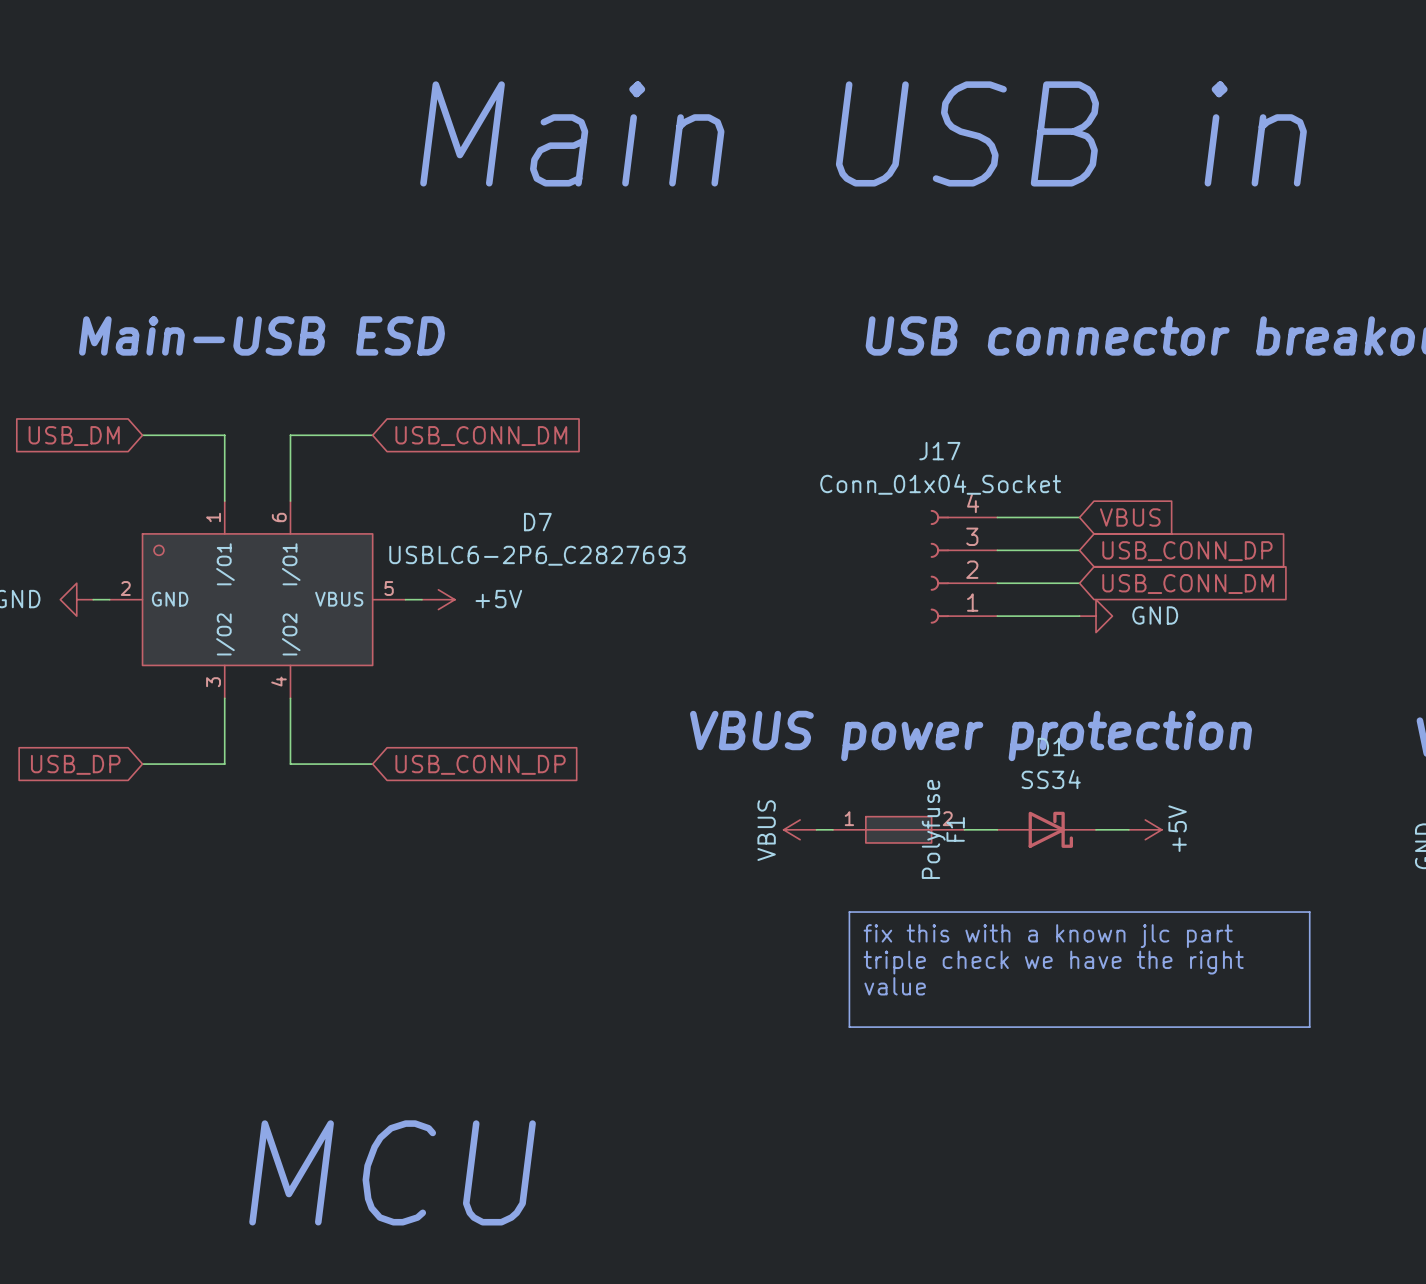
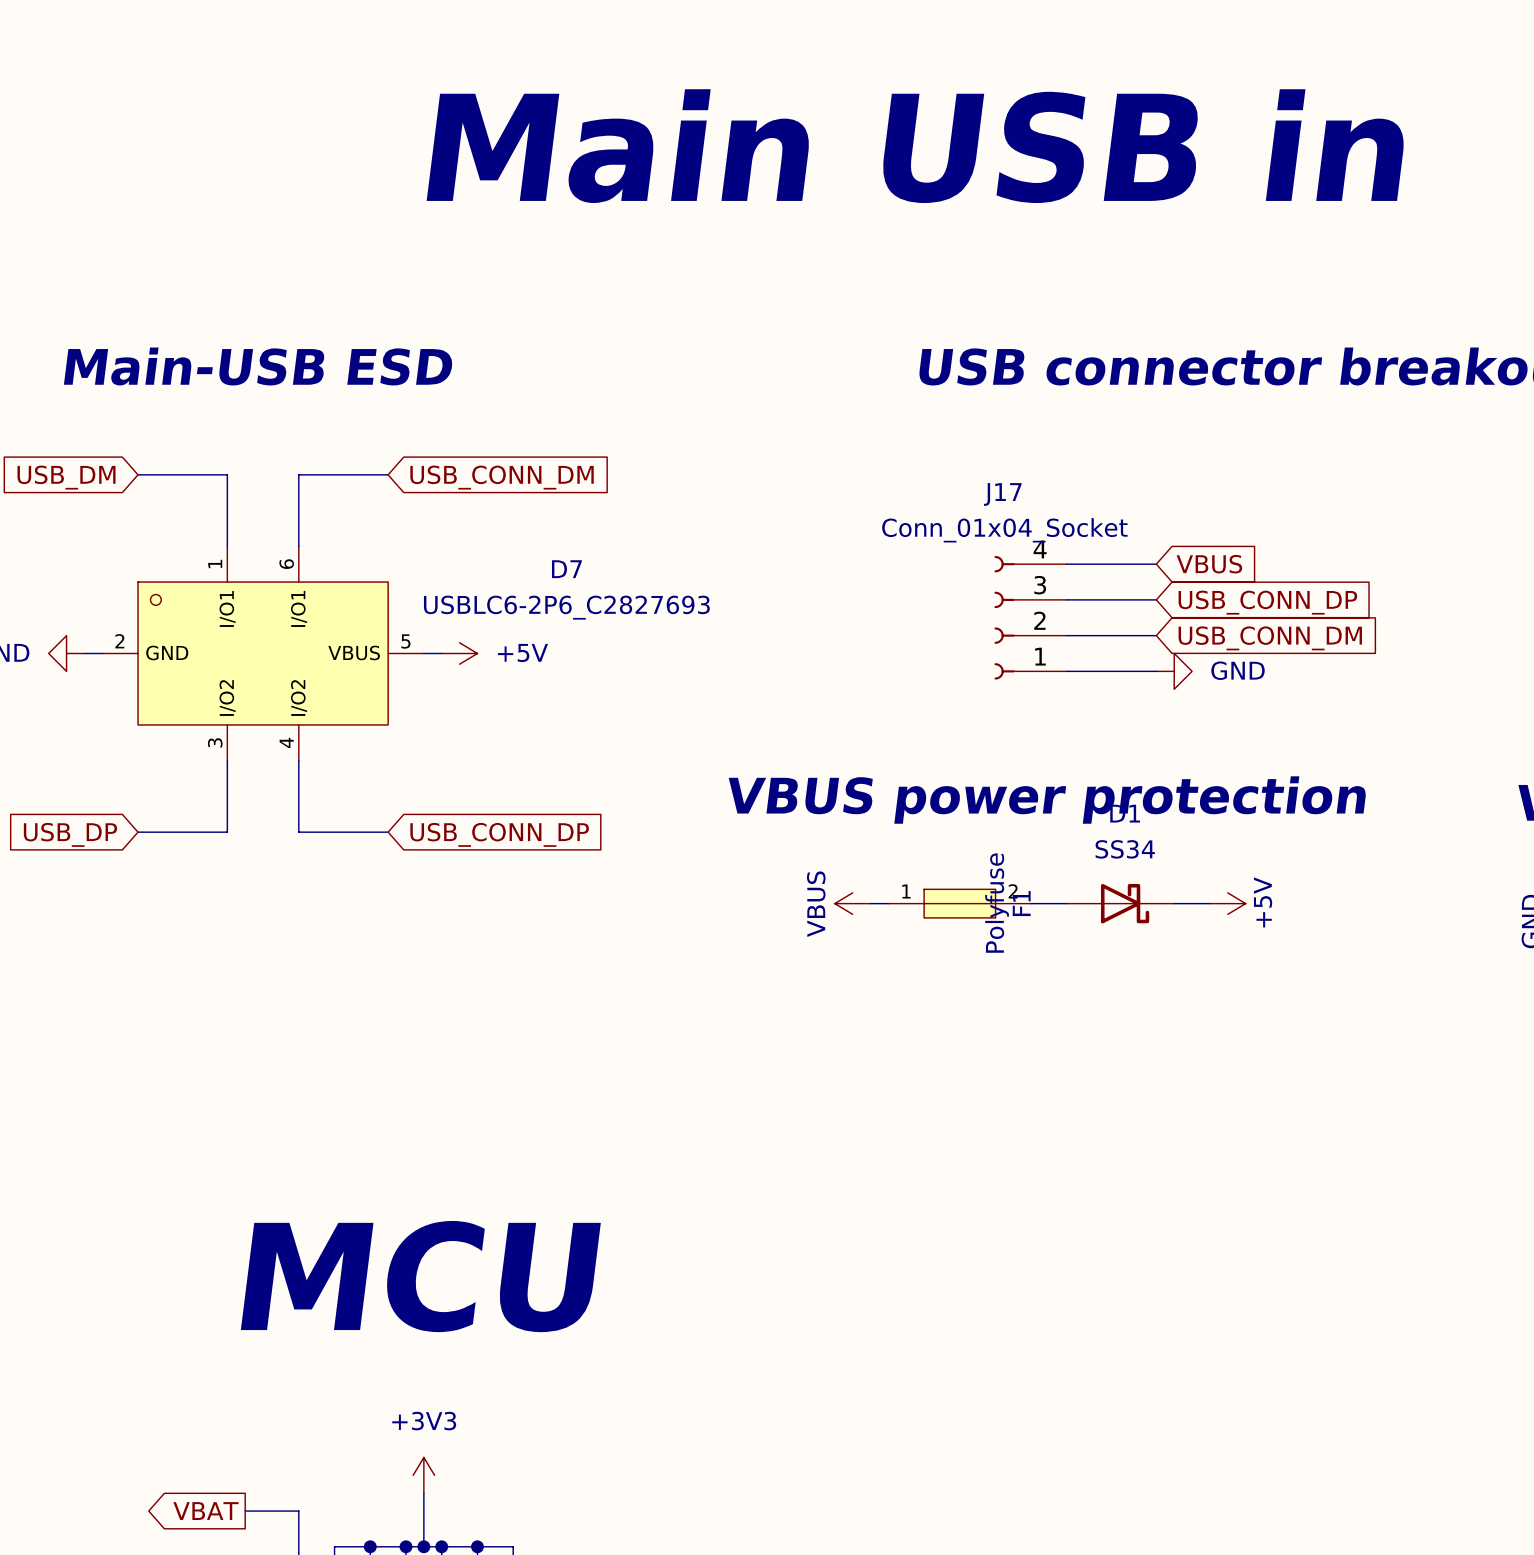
line: (849, 912) (1309, 912) (1309, 1027) (849, 1027) (849, 912) -> none
text: fix this with a known jlc part (1048, 936) -> none
text: triple check we have the right (1053, 962) -> none
text: value (895, 986) -> none

